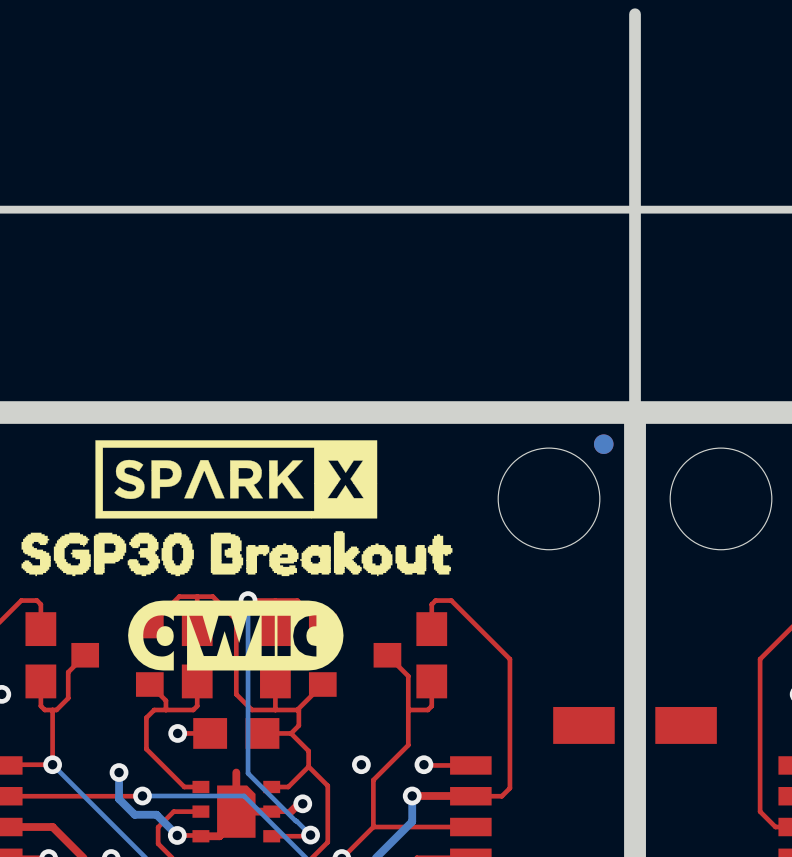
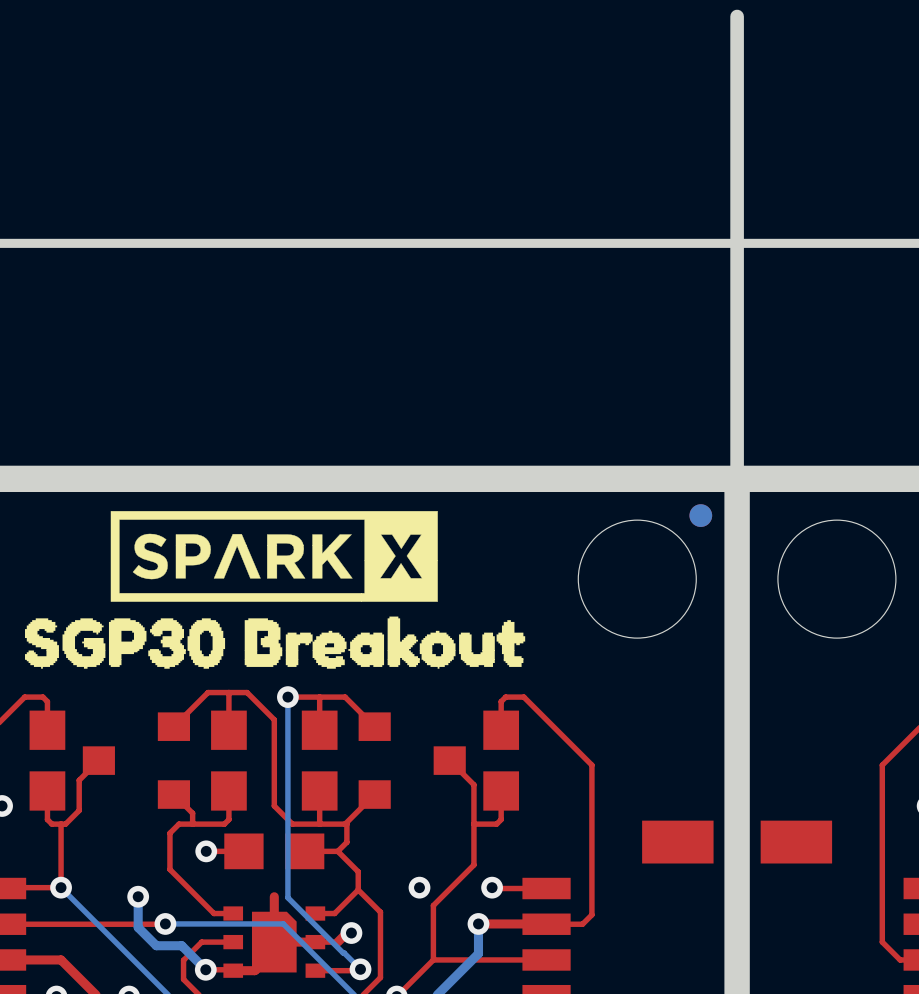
drawing: [128, 600, 344, 671] -> none

